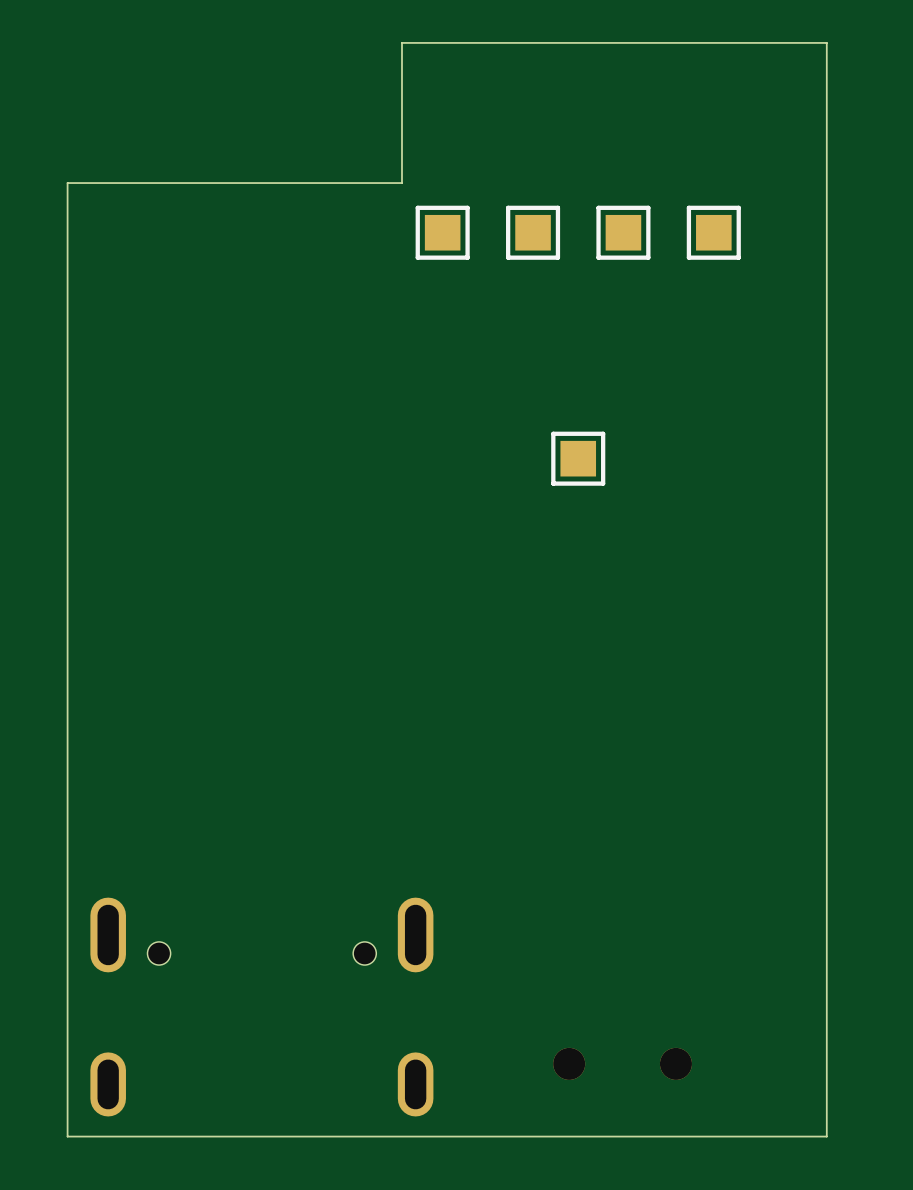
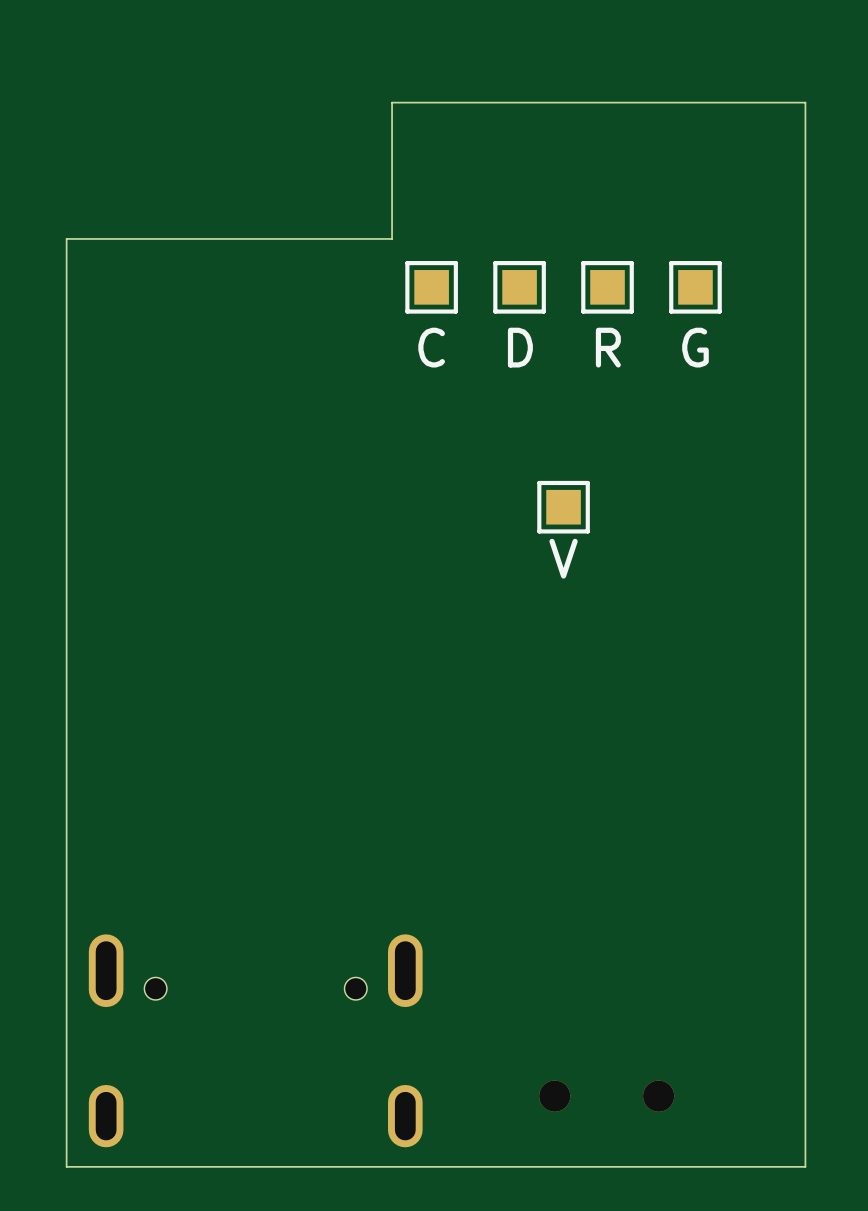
text: none -> C (431, 347)
text: none -> D (520, 347)
text: none -> R (608, 347)
text: none -> G (695, 347)
text: none -> V (563, 558)

